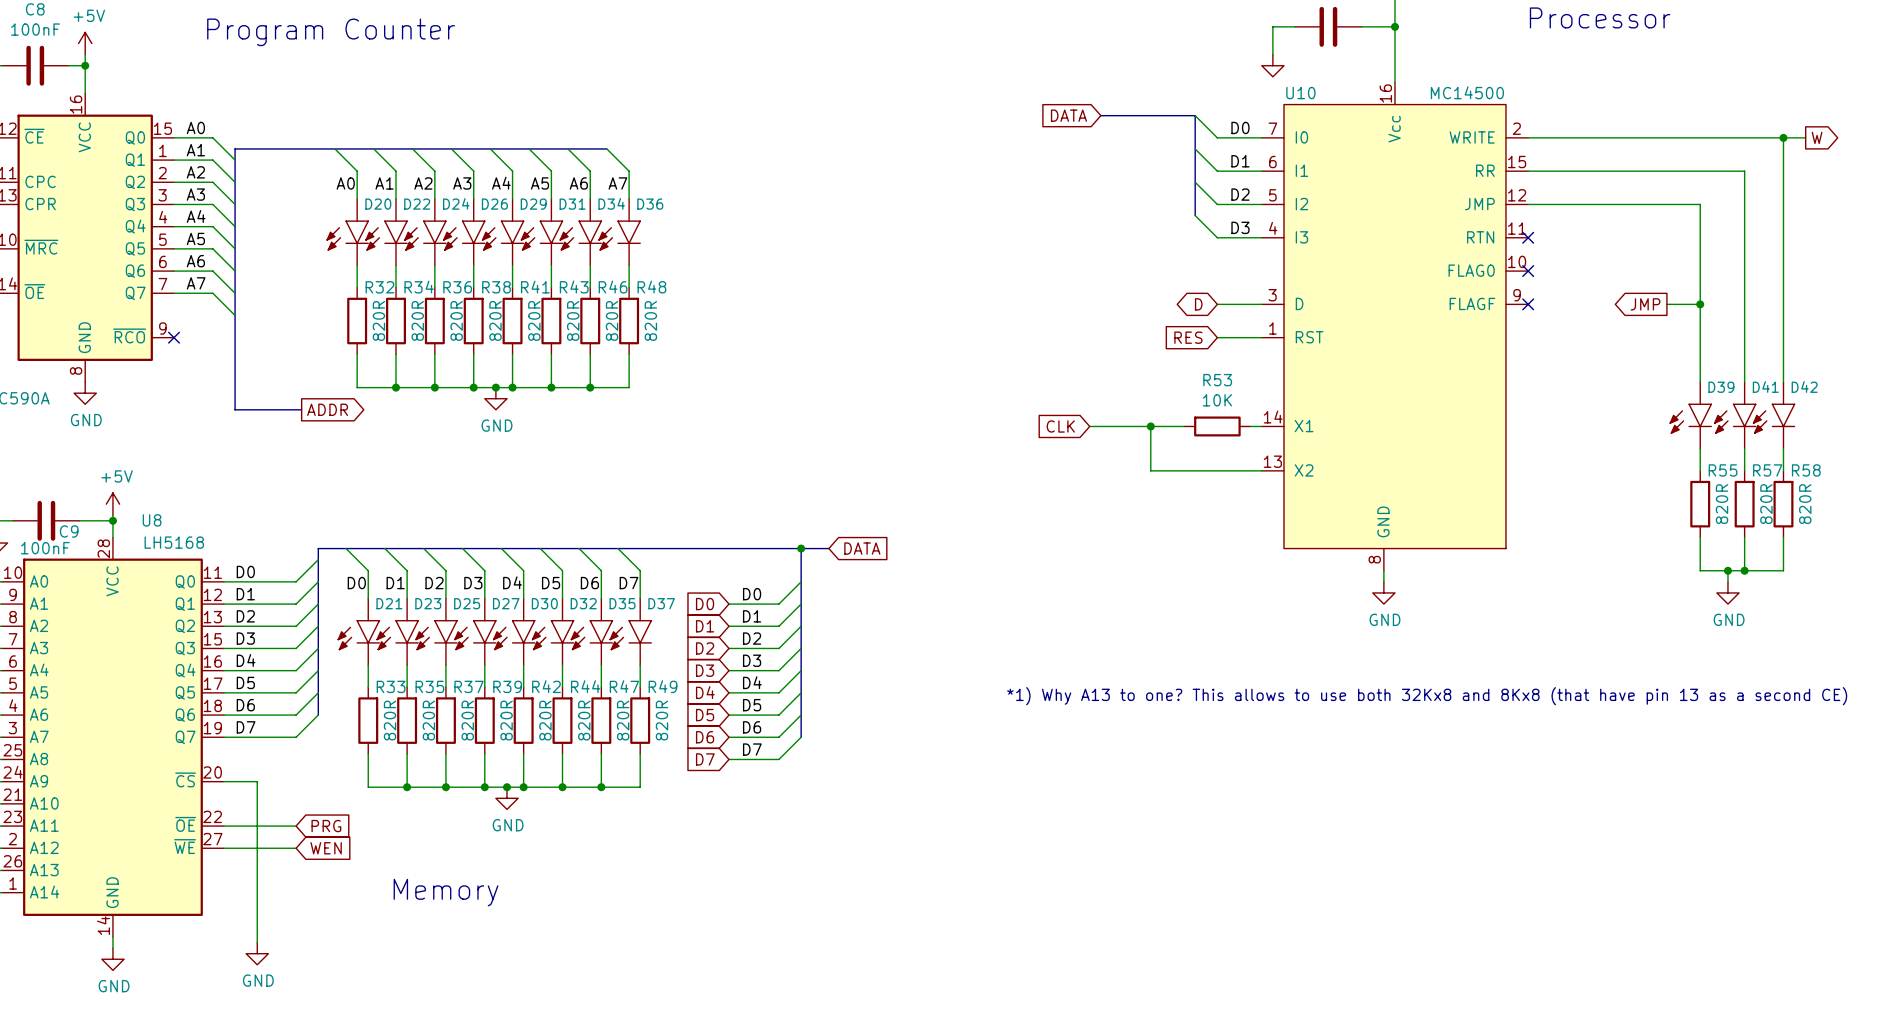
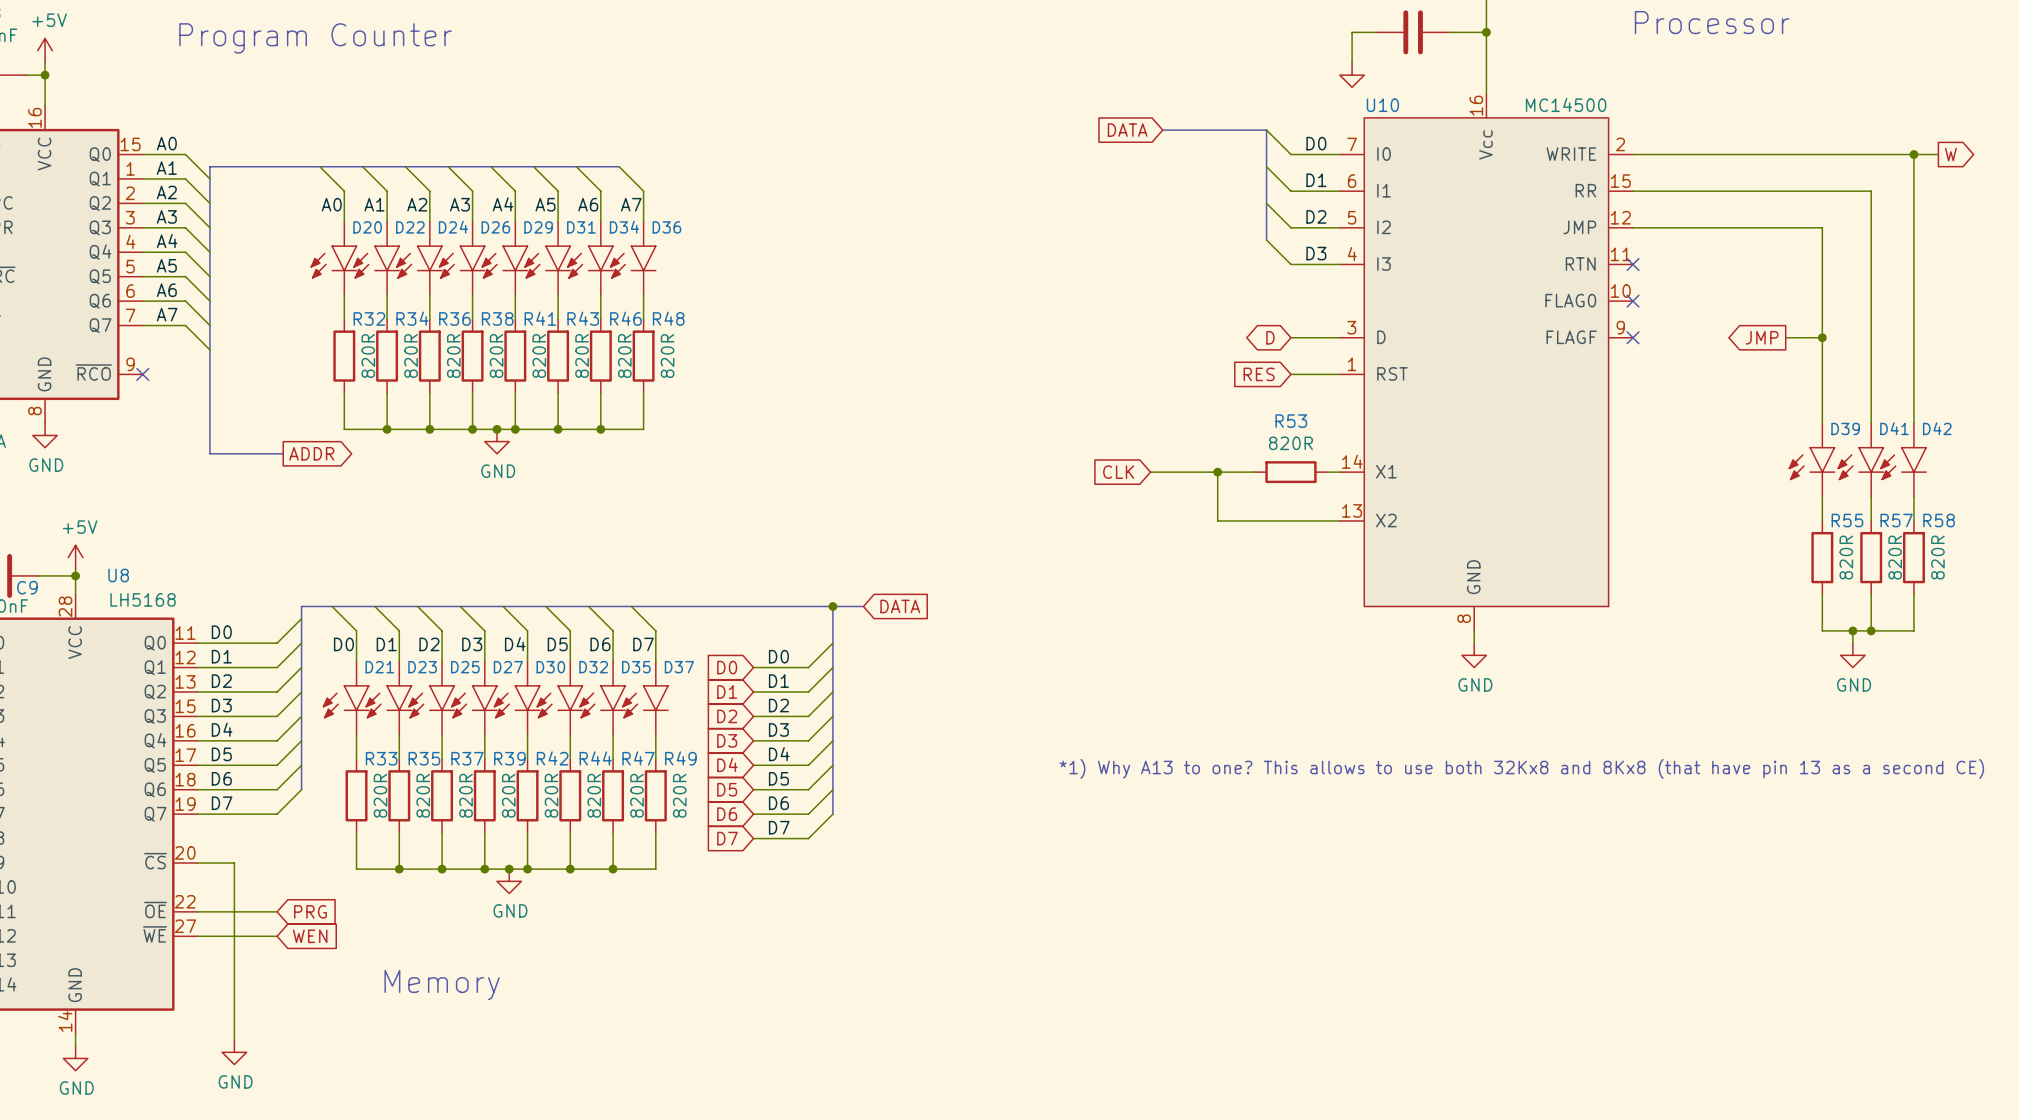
R53 value: 10K (1217, 400) -> 820R (1290, 443)

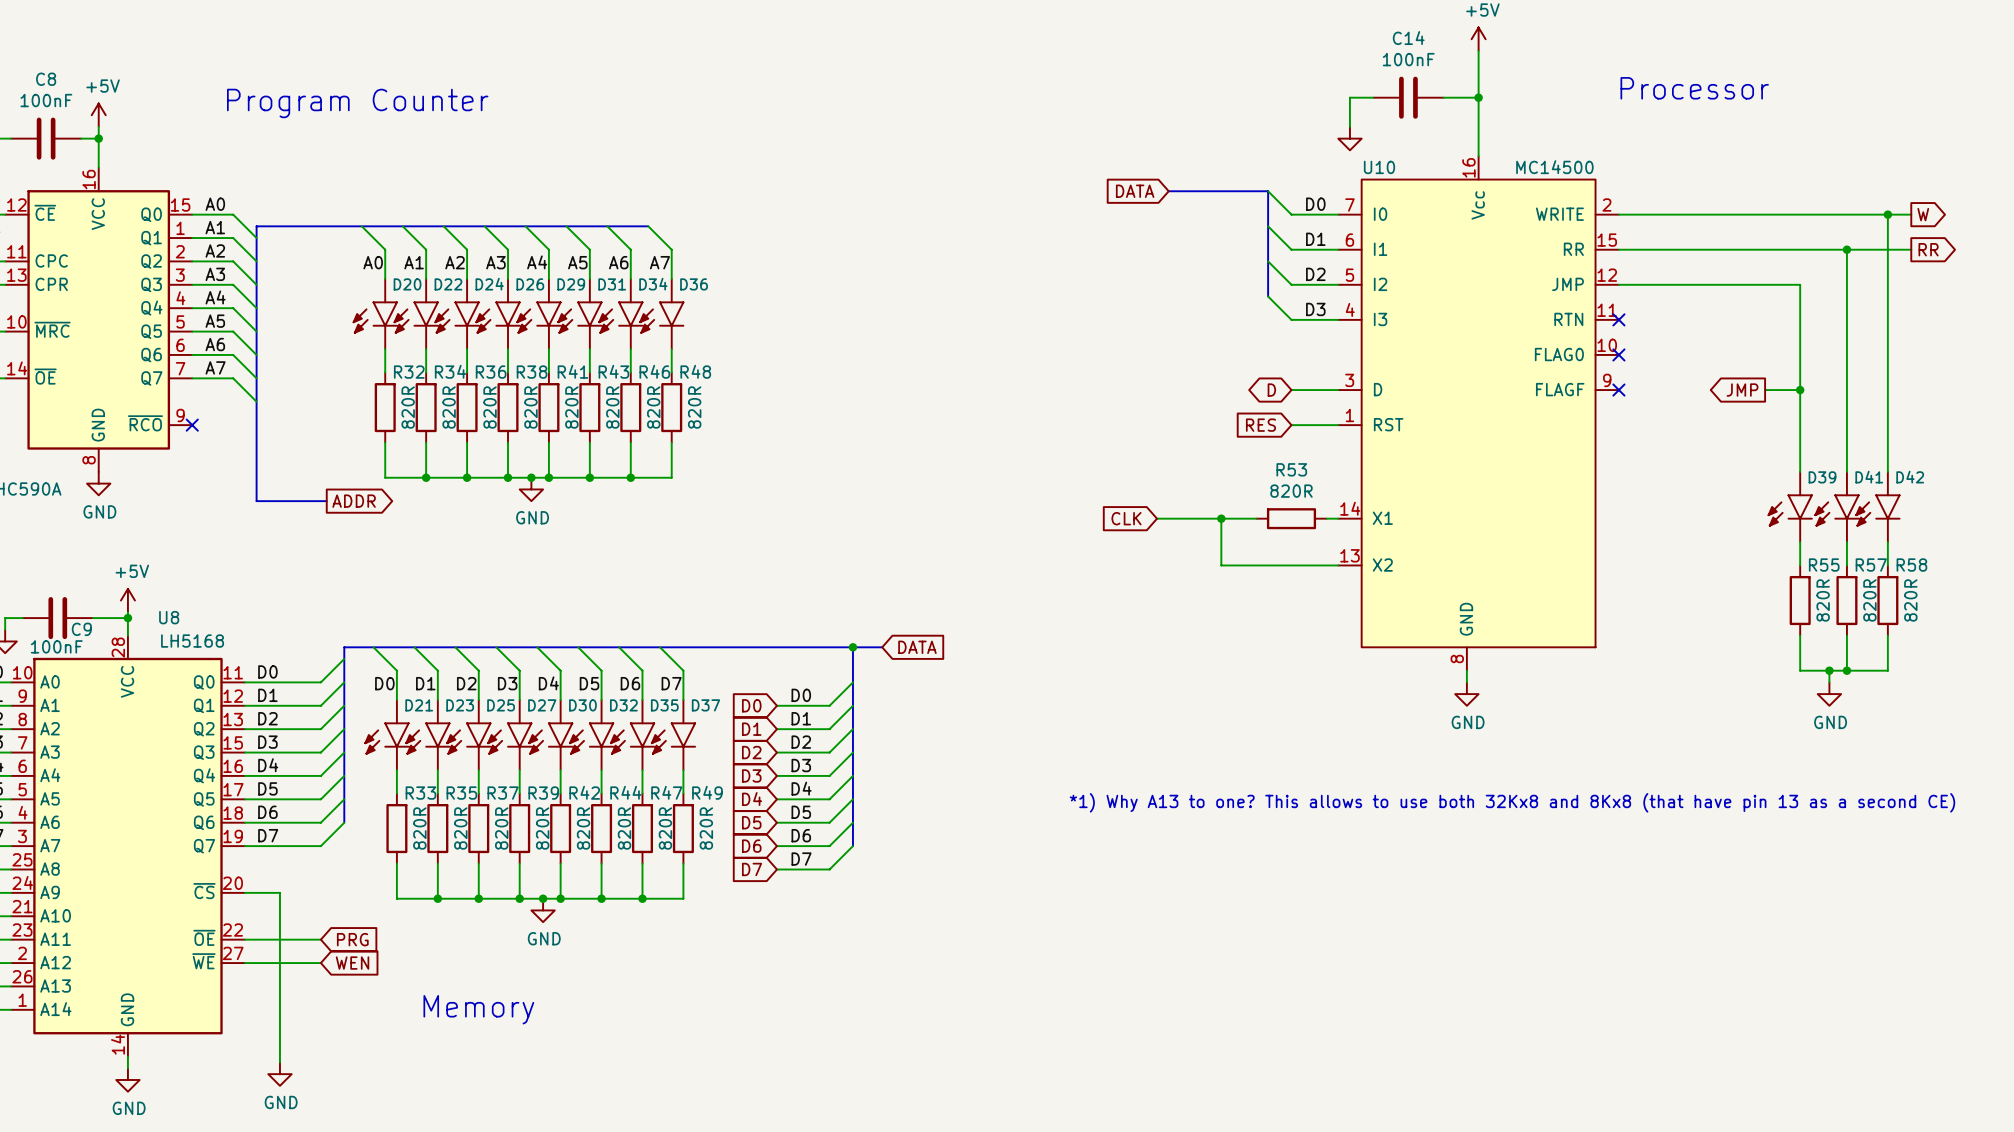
wire: none -> (1846, 249) (1911, 249)
junction: none -> (1846, 249)
global label: none -> RR (1928, 249)

